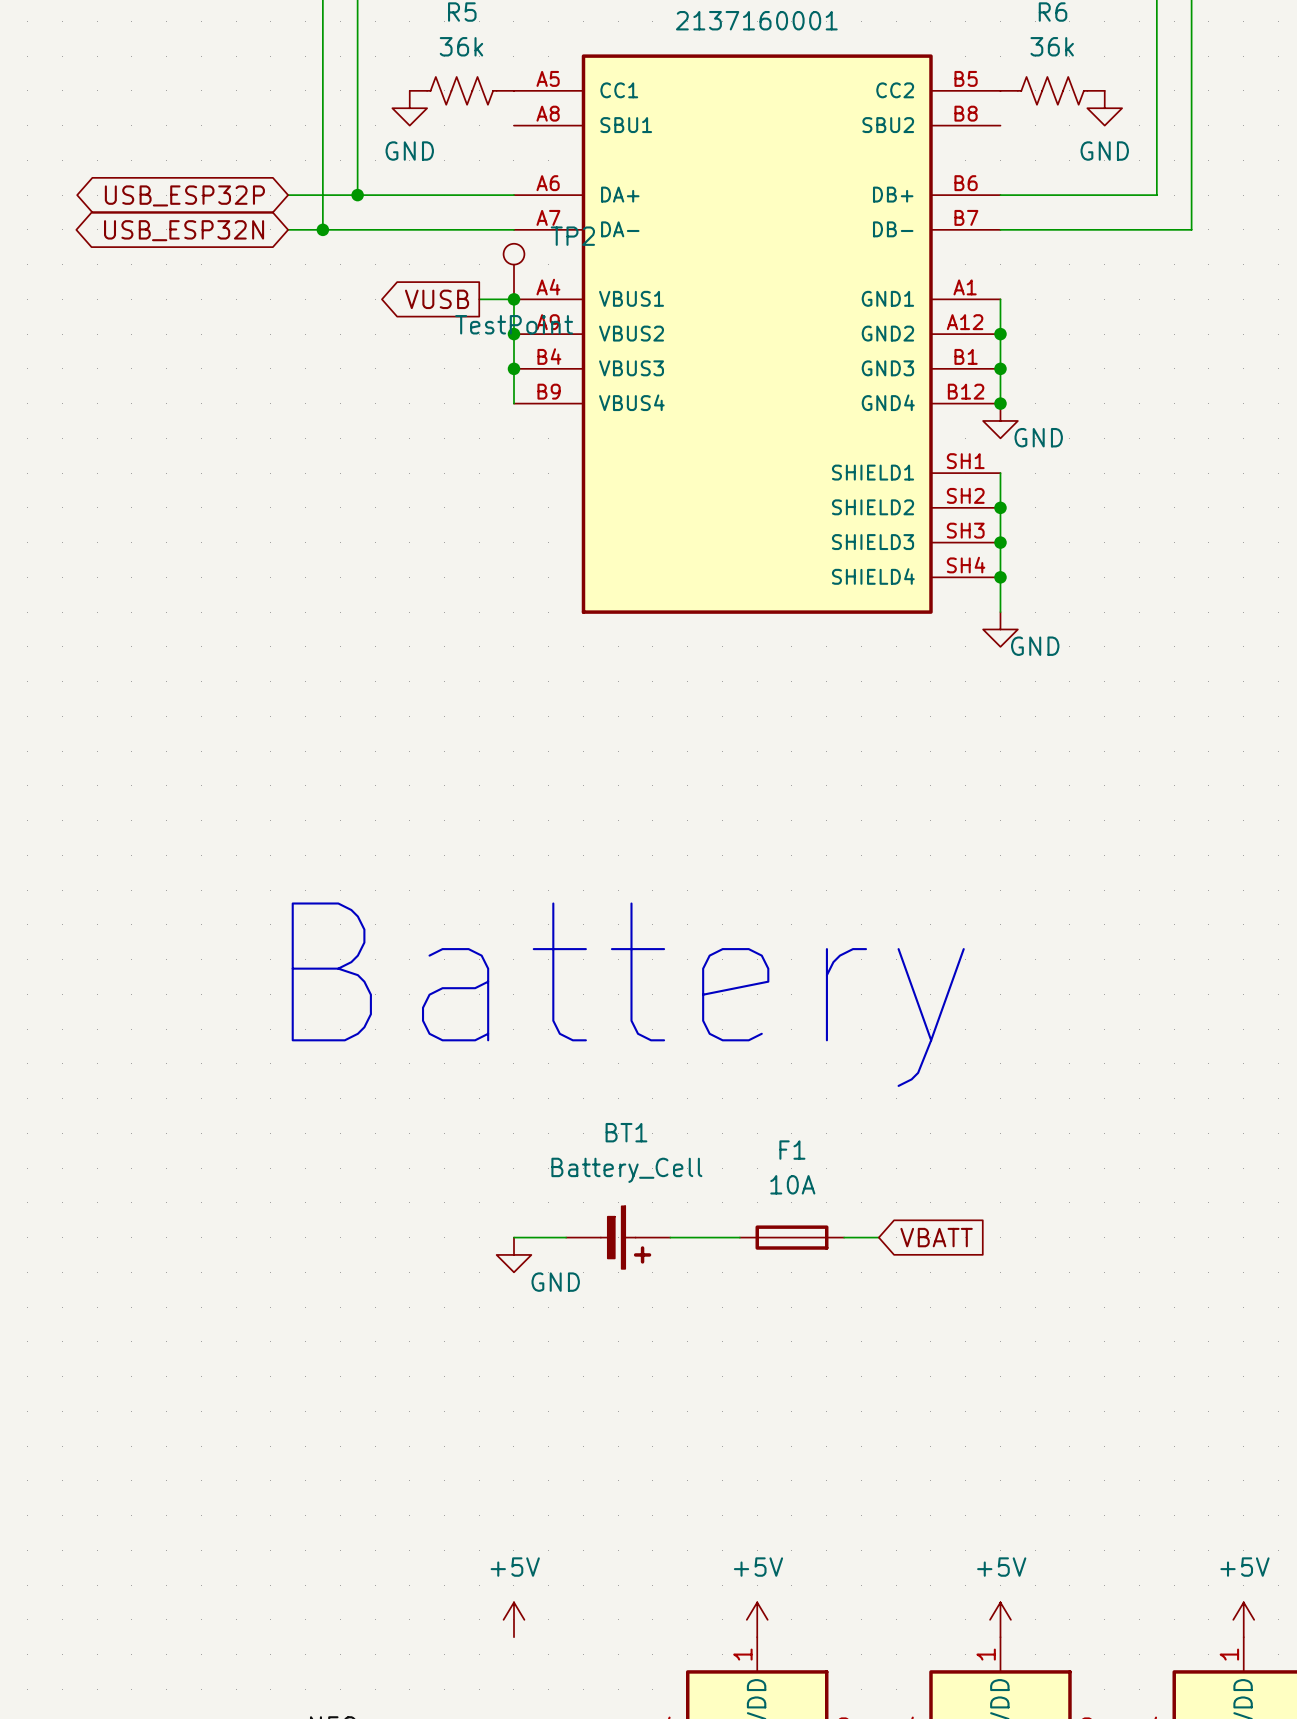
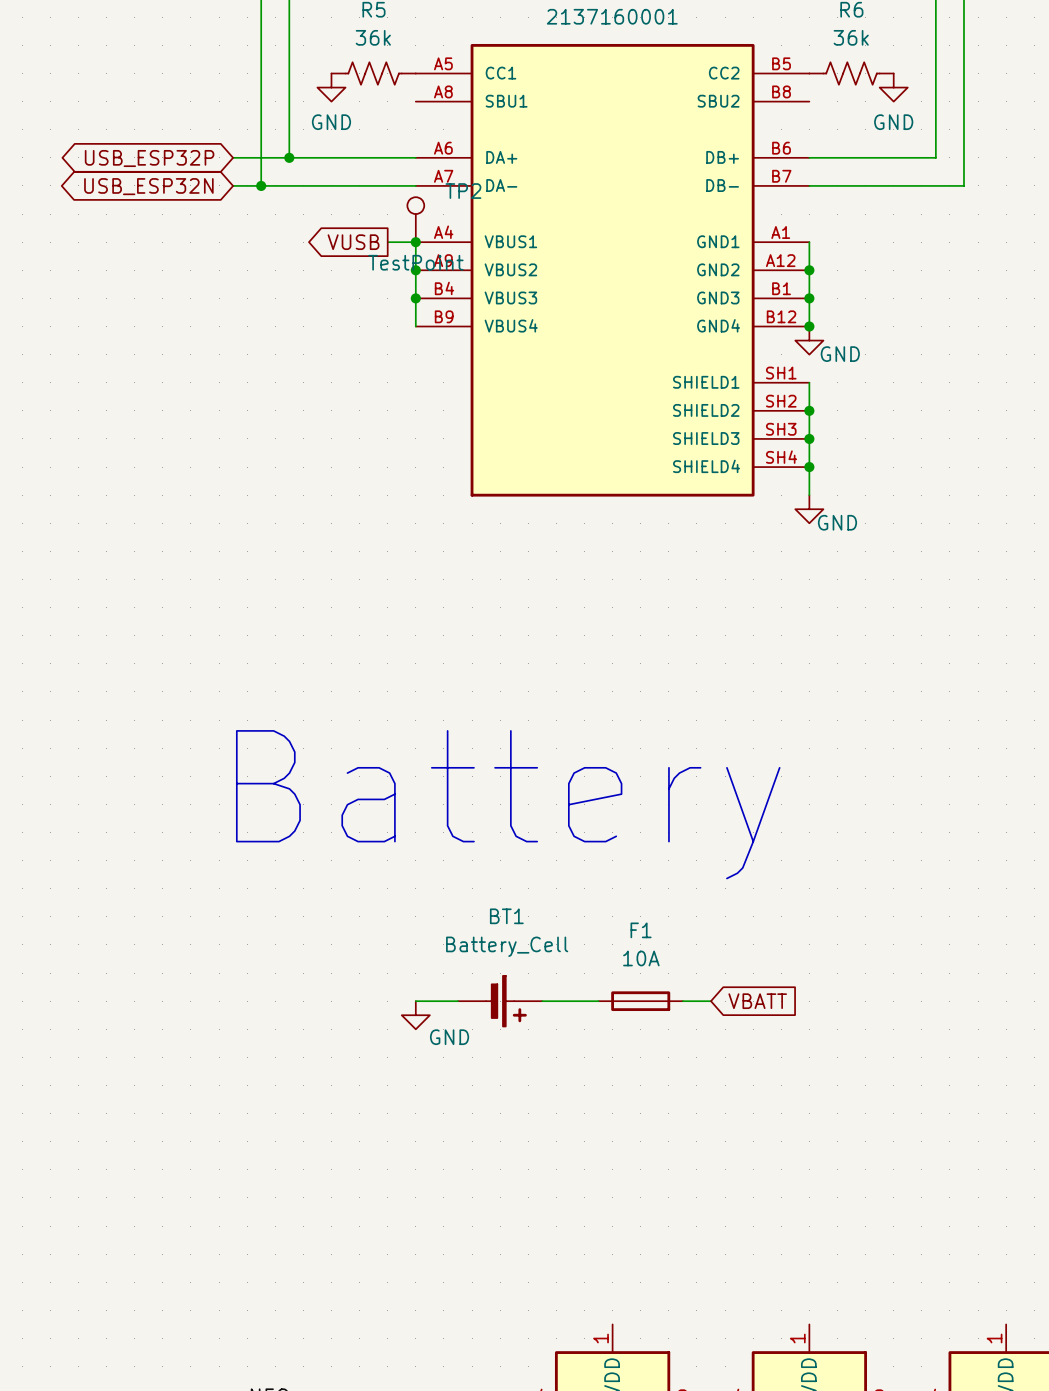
power symbol: +5V (513, 1619) -> none
power symbol: +5V (757, 1619) -> none
power symbol: +5V (1000, 1619) -> none
power symbol: +5V (1243, 1619) -> none

